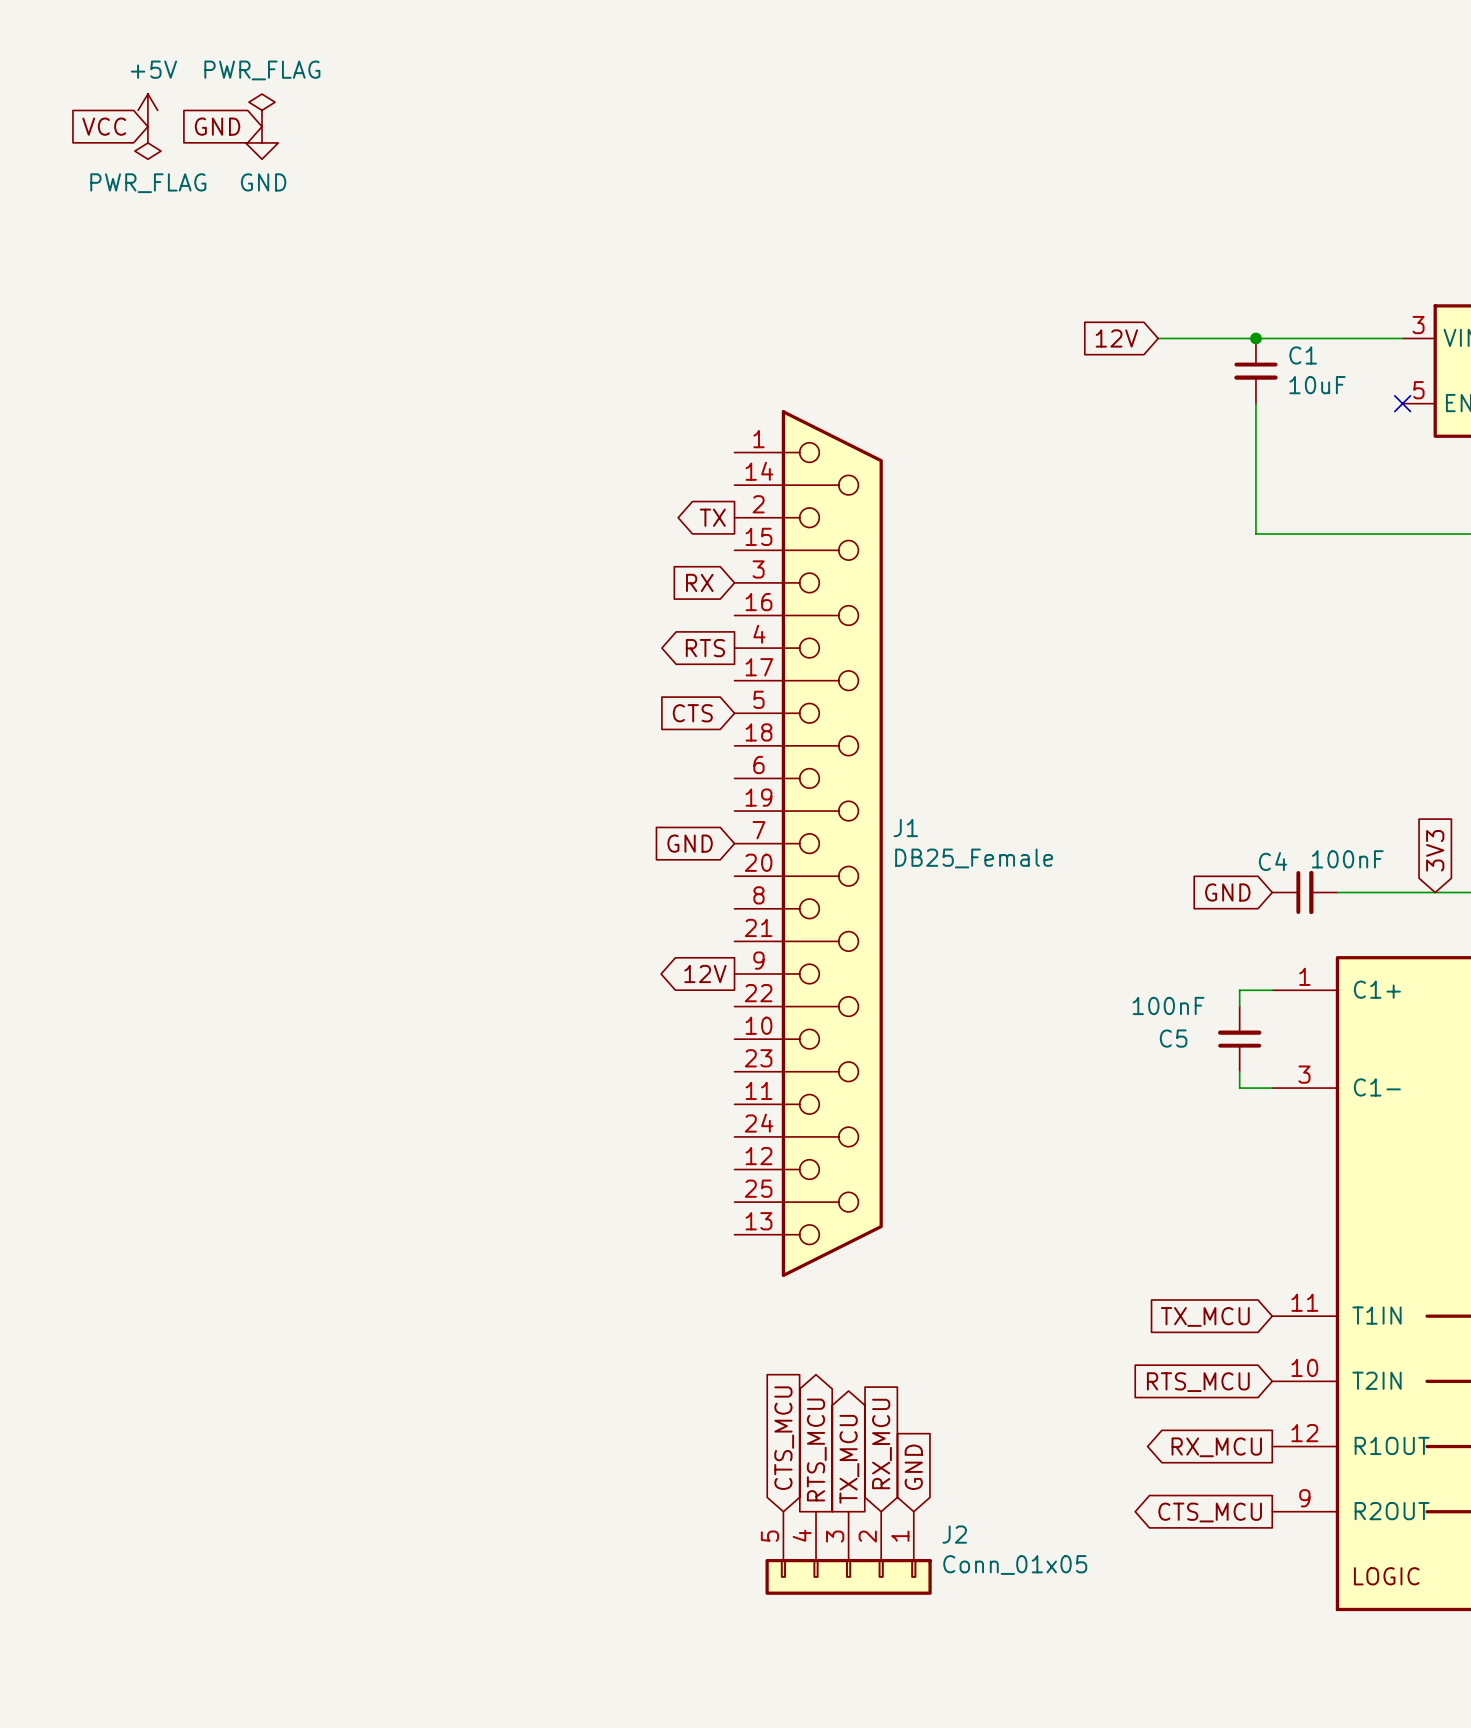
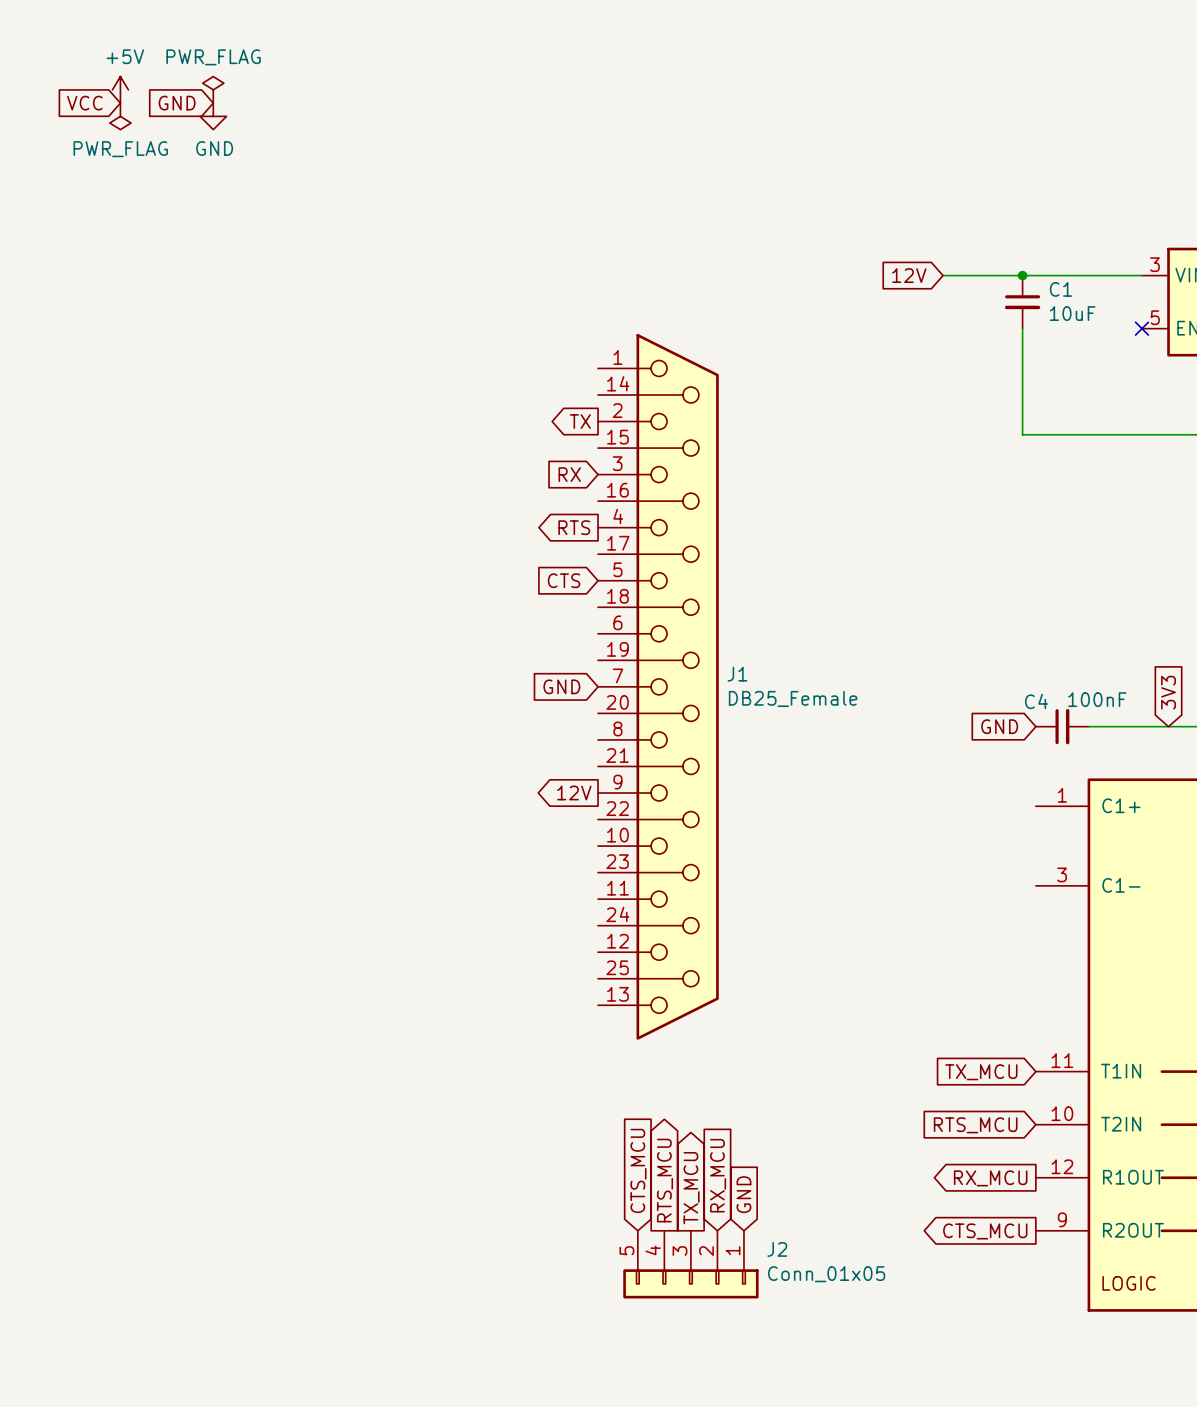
wire: (1272, 990) (1239, 990) (1239, 1006) -> none
C5: 100nF (1239, 1039) -> none
wire: (1239, 1071) (1239, 1088) (1272, 1088) -> none

